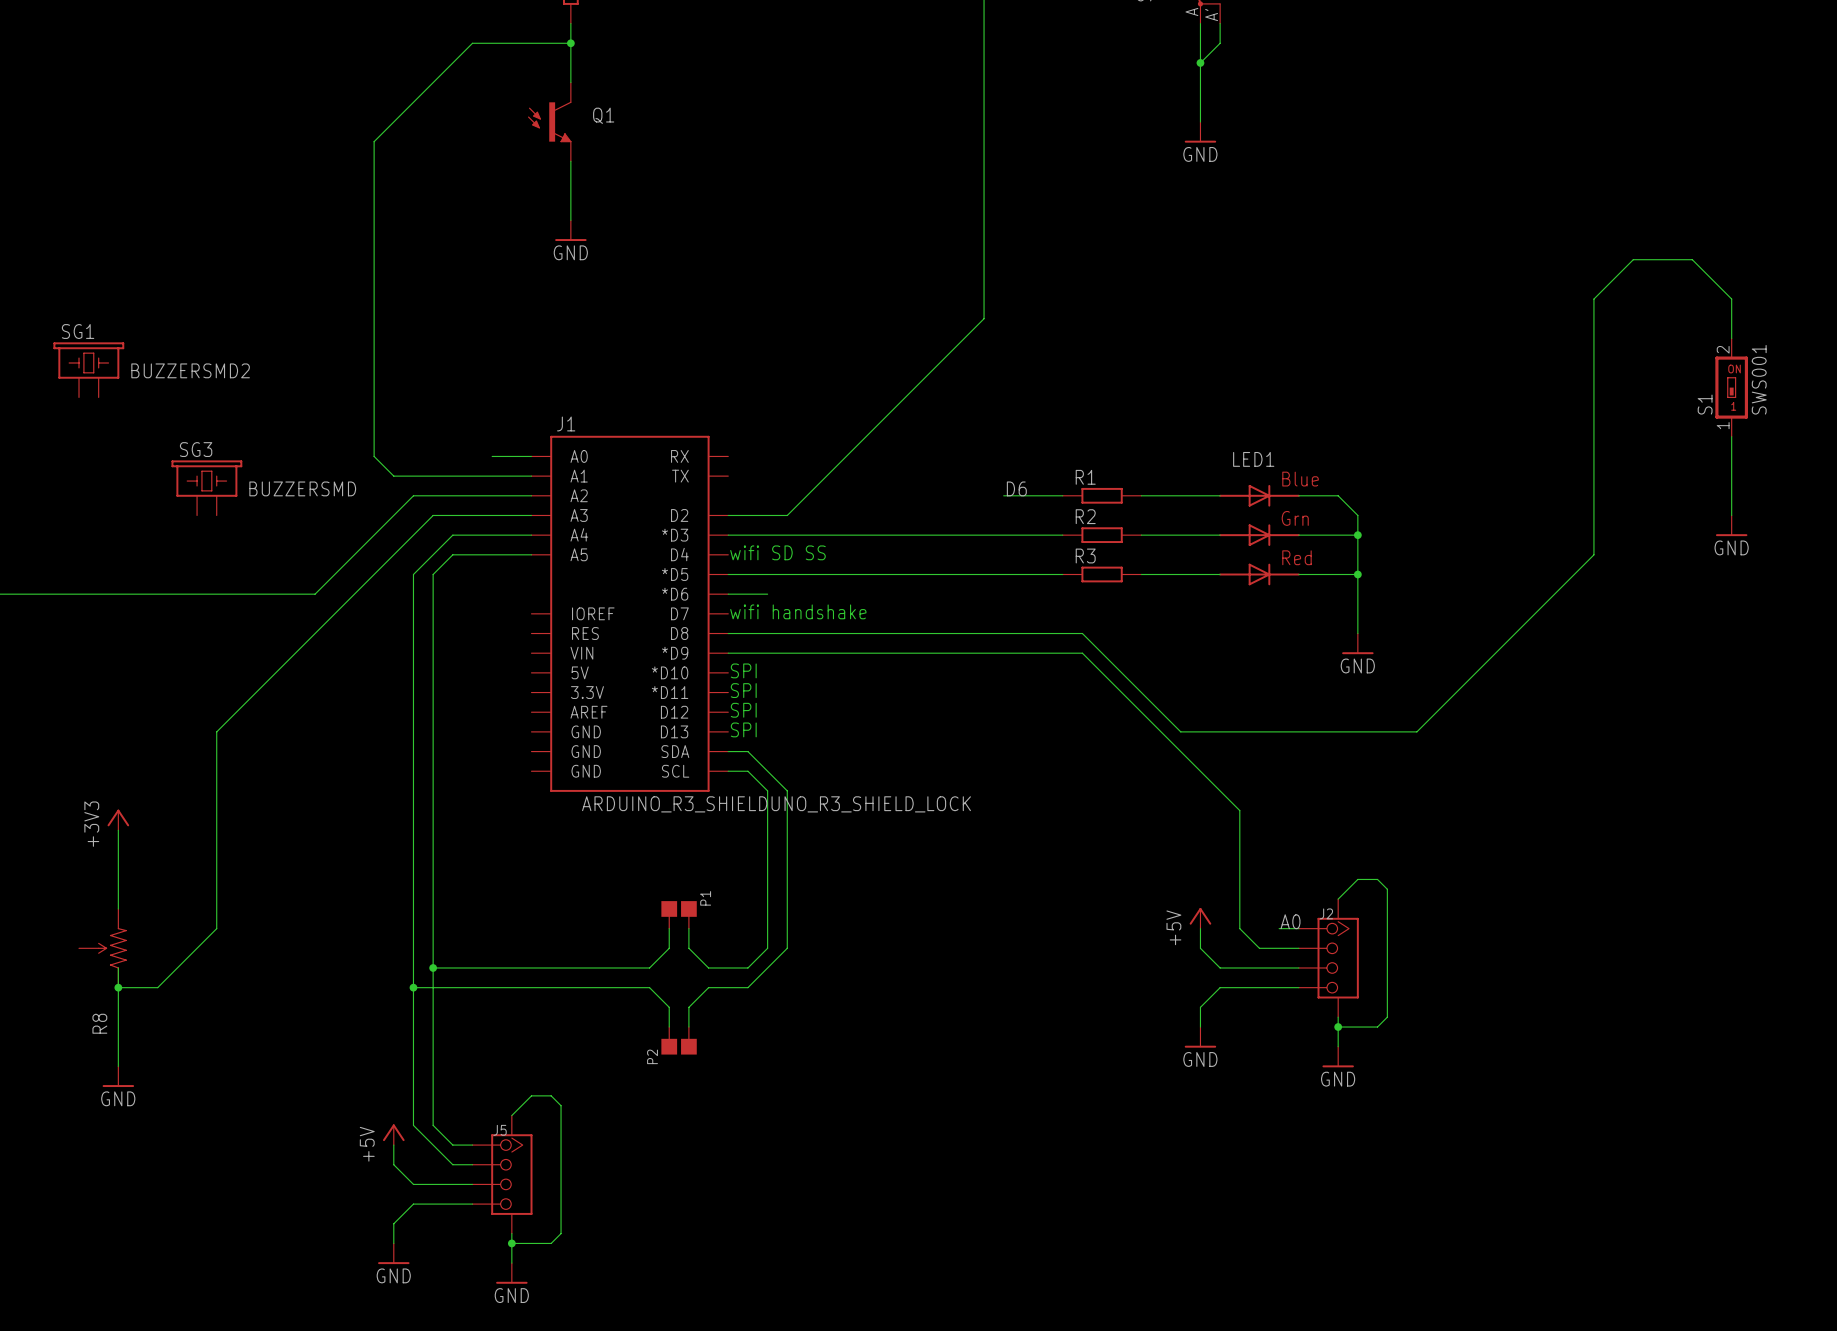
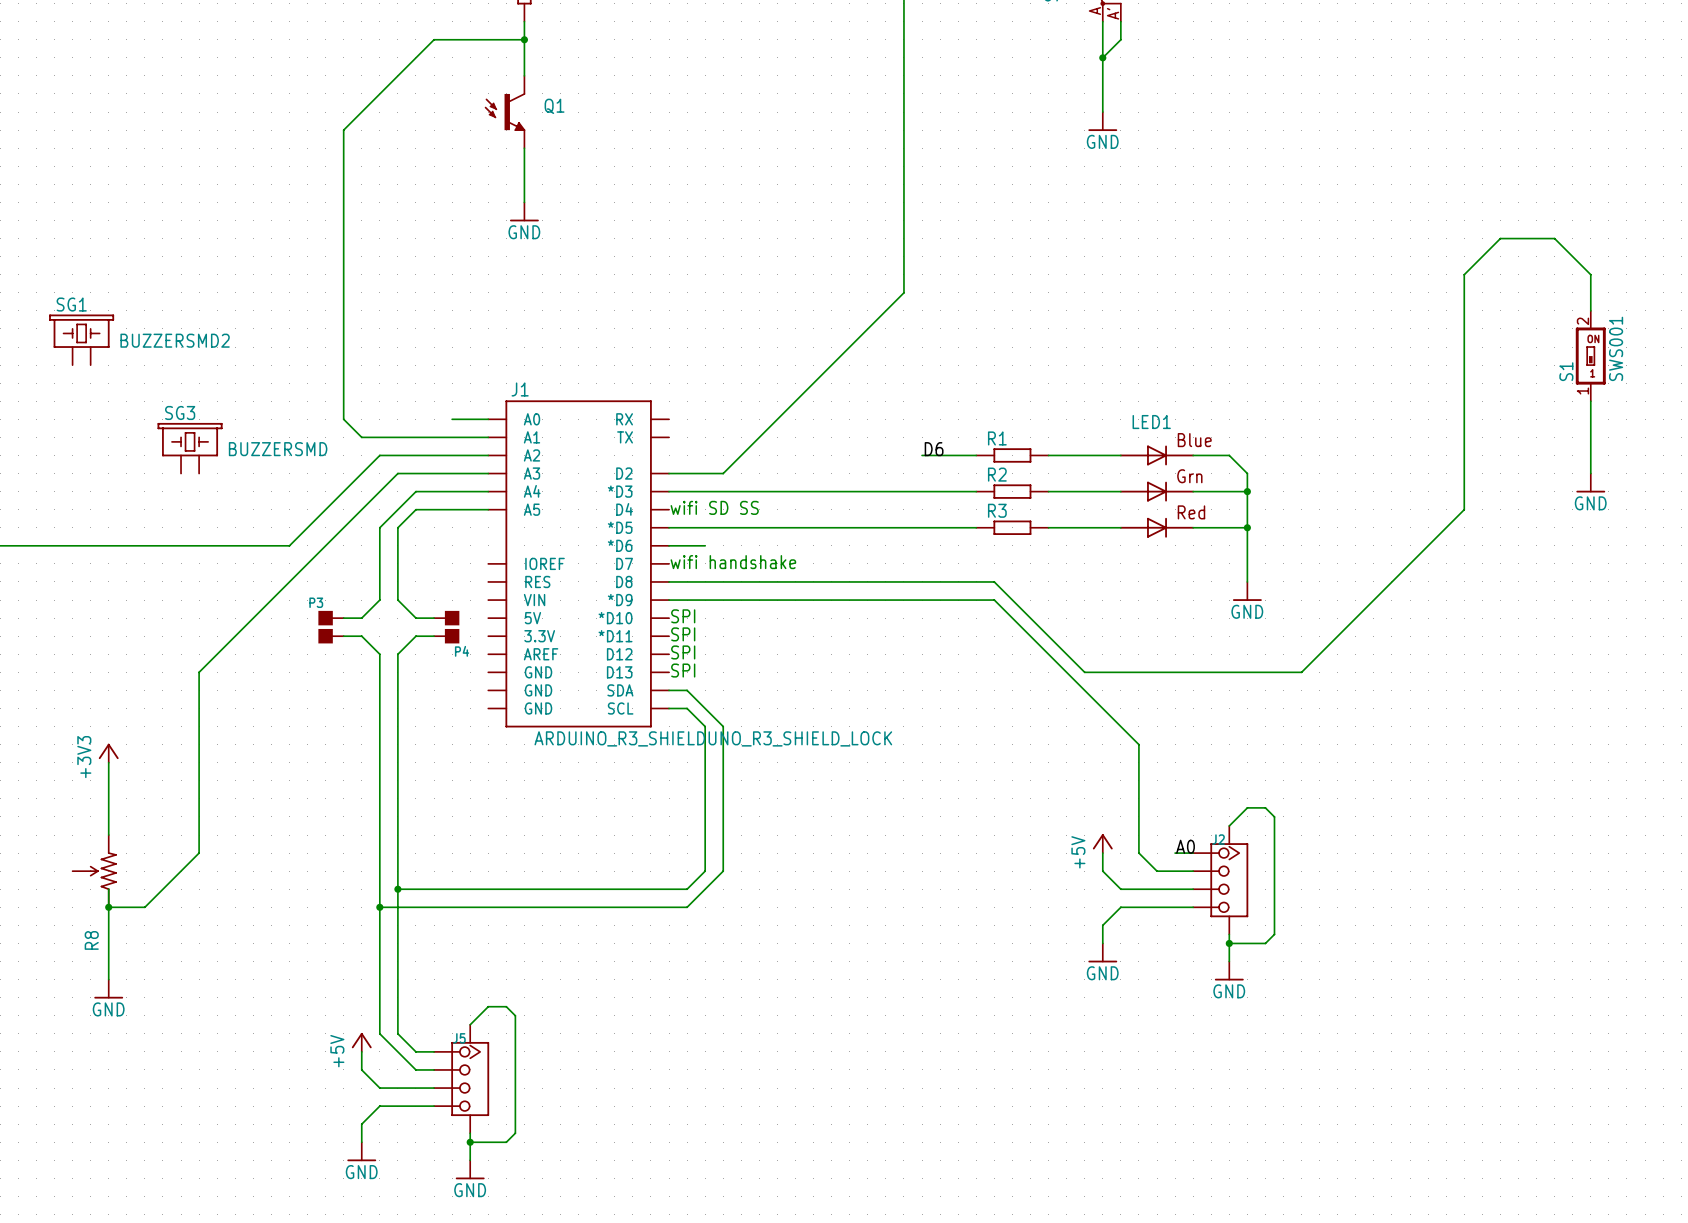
wire: (413, 653) (413, 712) -> (379, 600) (361, 618) (343, 618)
wire: (433, 653) (433, 712) -> (397, 600) (415, 618) (434, 618)
P3: none -> (331, 627)
P4: none -> (446, 627)
wire: none -> (343, 636) (361, 636) (379, 654)
wire: none -> (434, 636) (415, 636) (397, 654)
P1: (679, 914) -> none
wire: (669, 928) (669, 948) (649, 967) -> none
wire: (688, 928) (688, 948) (708, 967) -> (596, 889) (650, 889)
wire: (649, 987) (669, 1007) (669, 1027) -> none
wire: (708, 987) (688, 1007) (688, 1027) -> (650, 907) (596, 907)
P2: (679, 1040) -> none

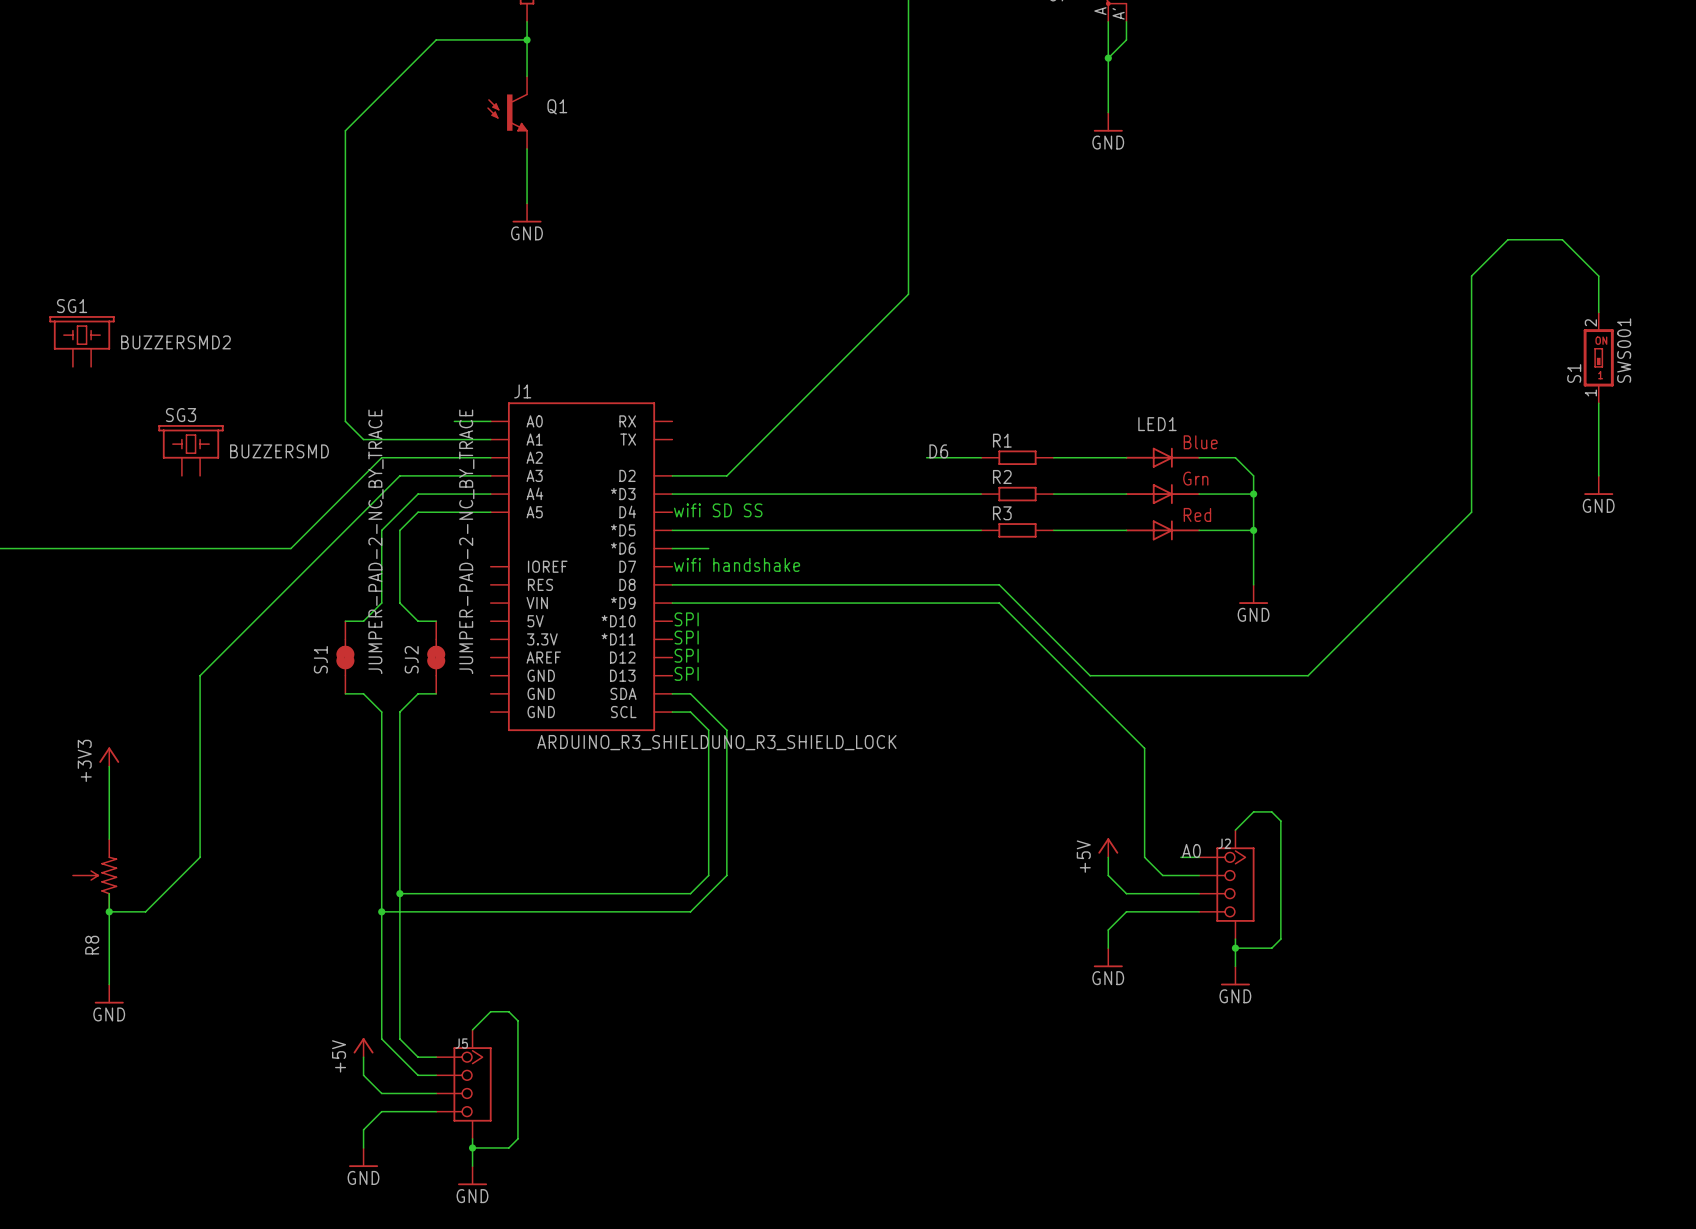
P3: (331, 627) -> none
P4: (446, 627) -> none
wire: (343, 636) (361, 636) (379, 654) (379, 708) -> (345, 693) (363, 693) (381, 712)
wire: (434, 636) (415, 636) (397, 654) (397, 708) -> (436, 693) (418, 693) (399, 712)
SJ1: none -> JUMPER-PAD-2-NC_BY_TRACE (345, 657)
SJ2: none -> JUMPER-PAD-2-NC_BY_TRACE (436, 657)

